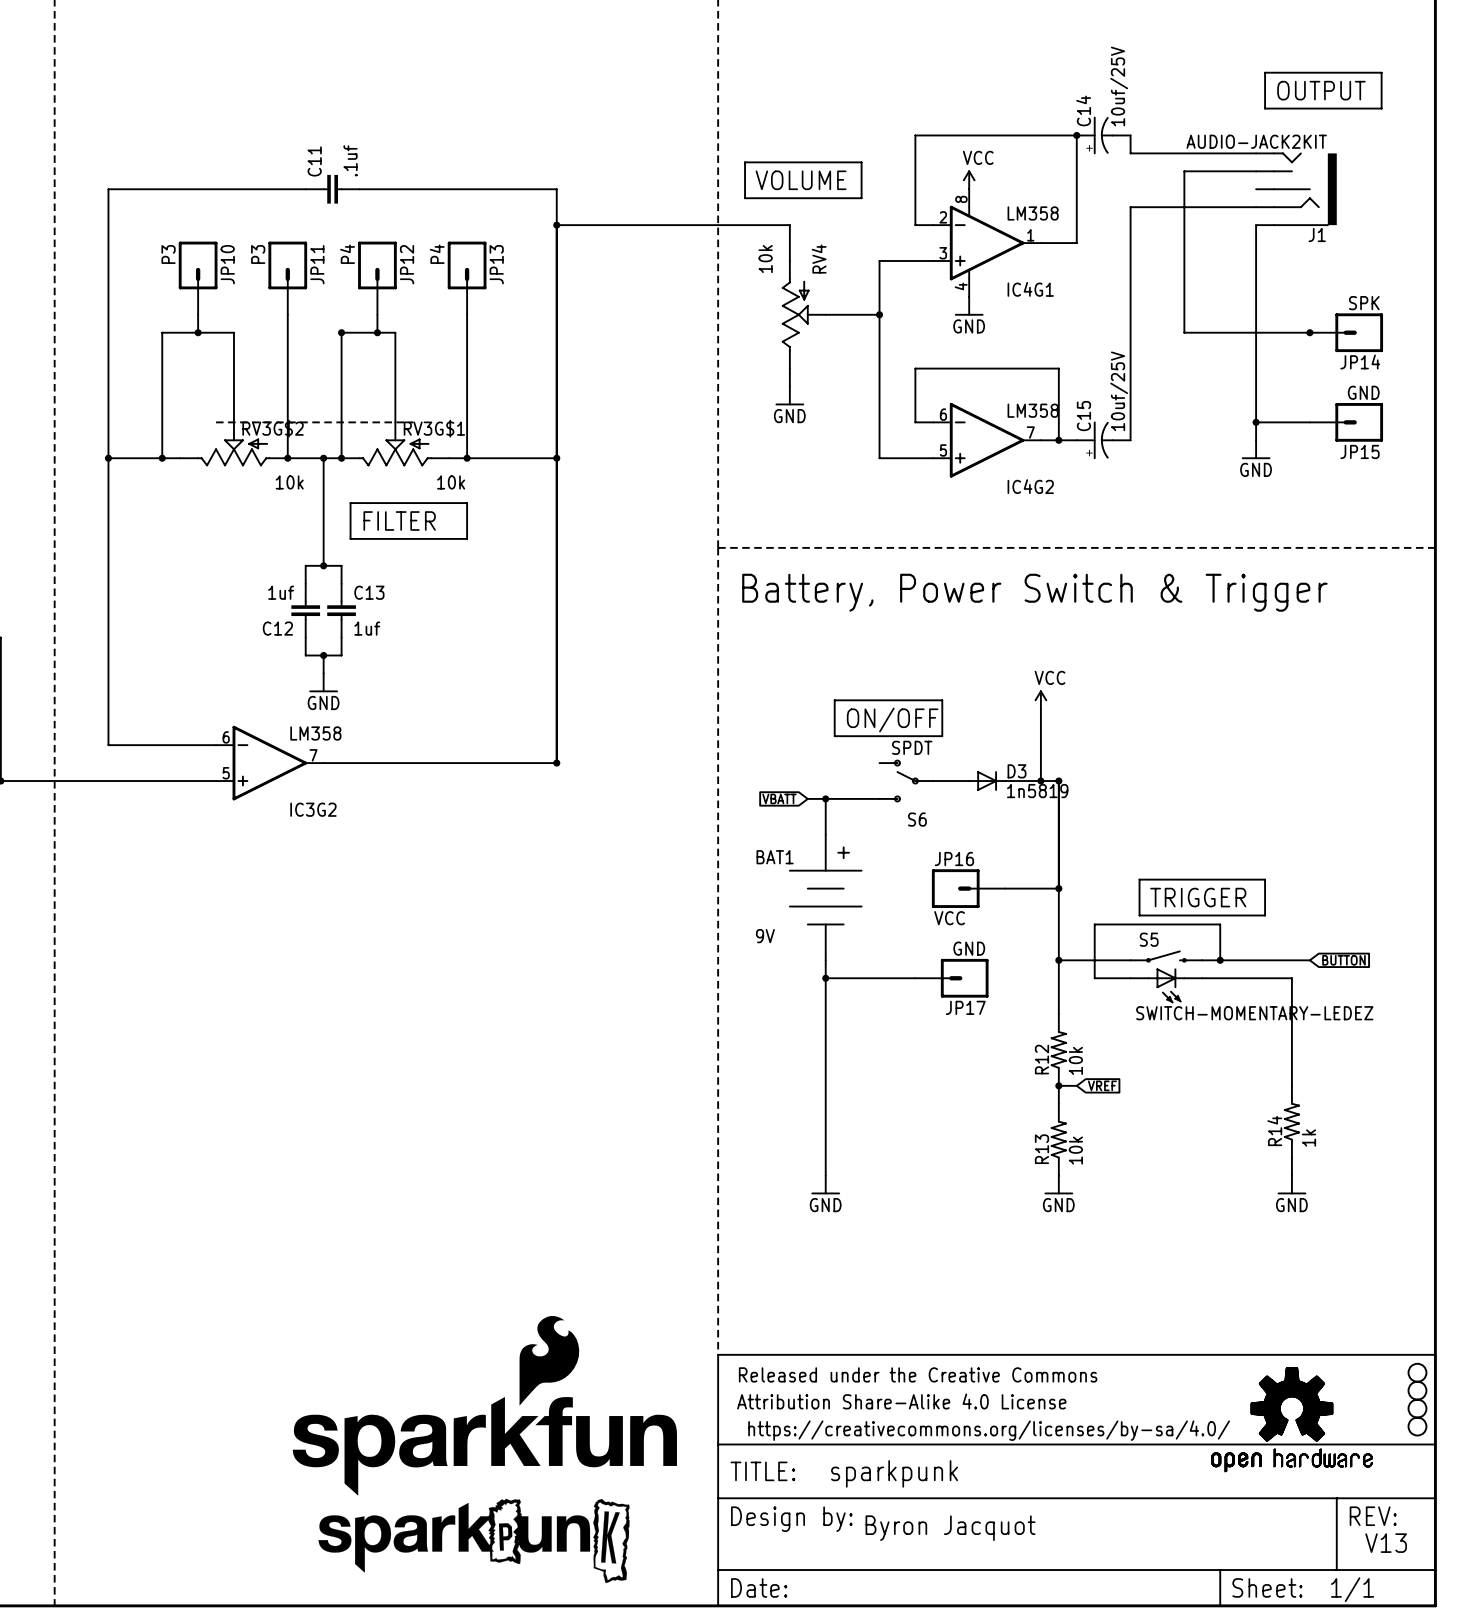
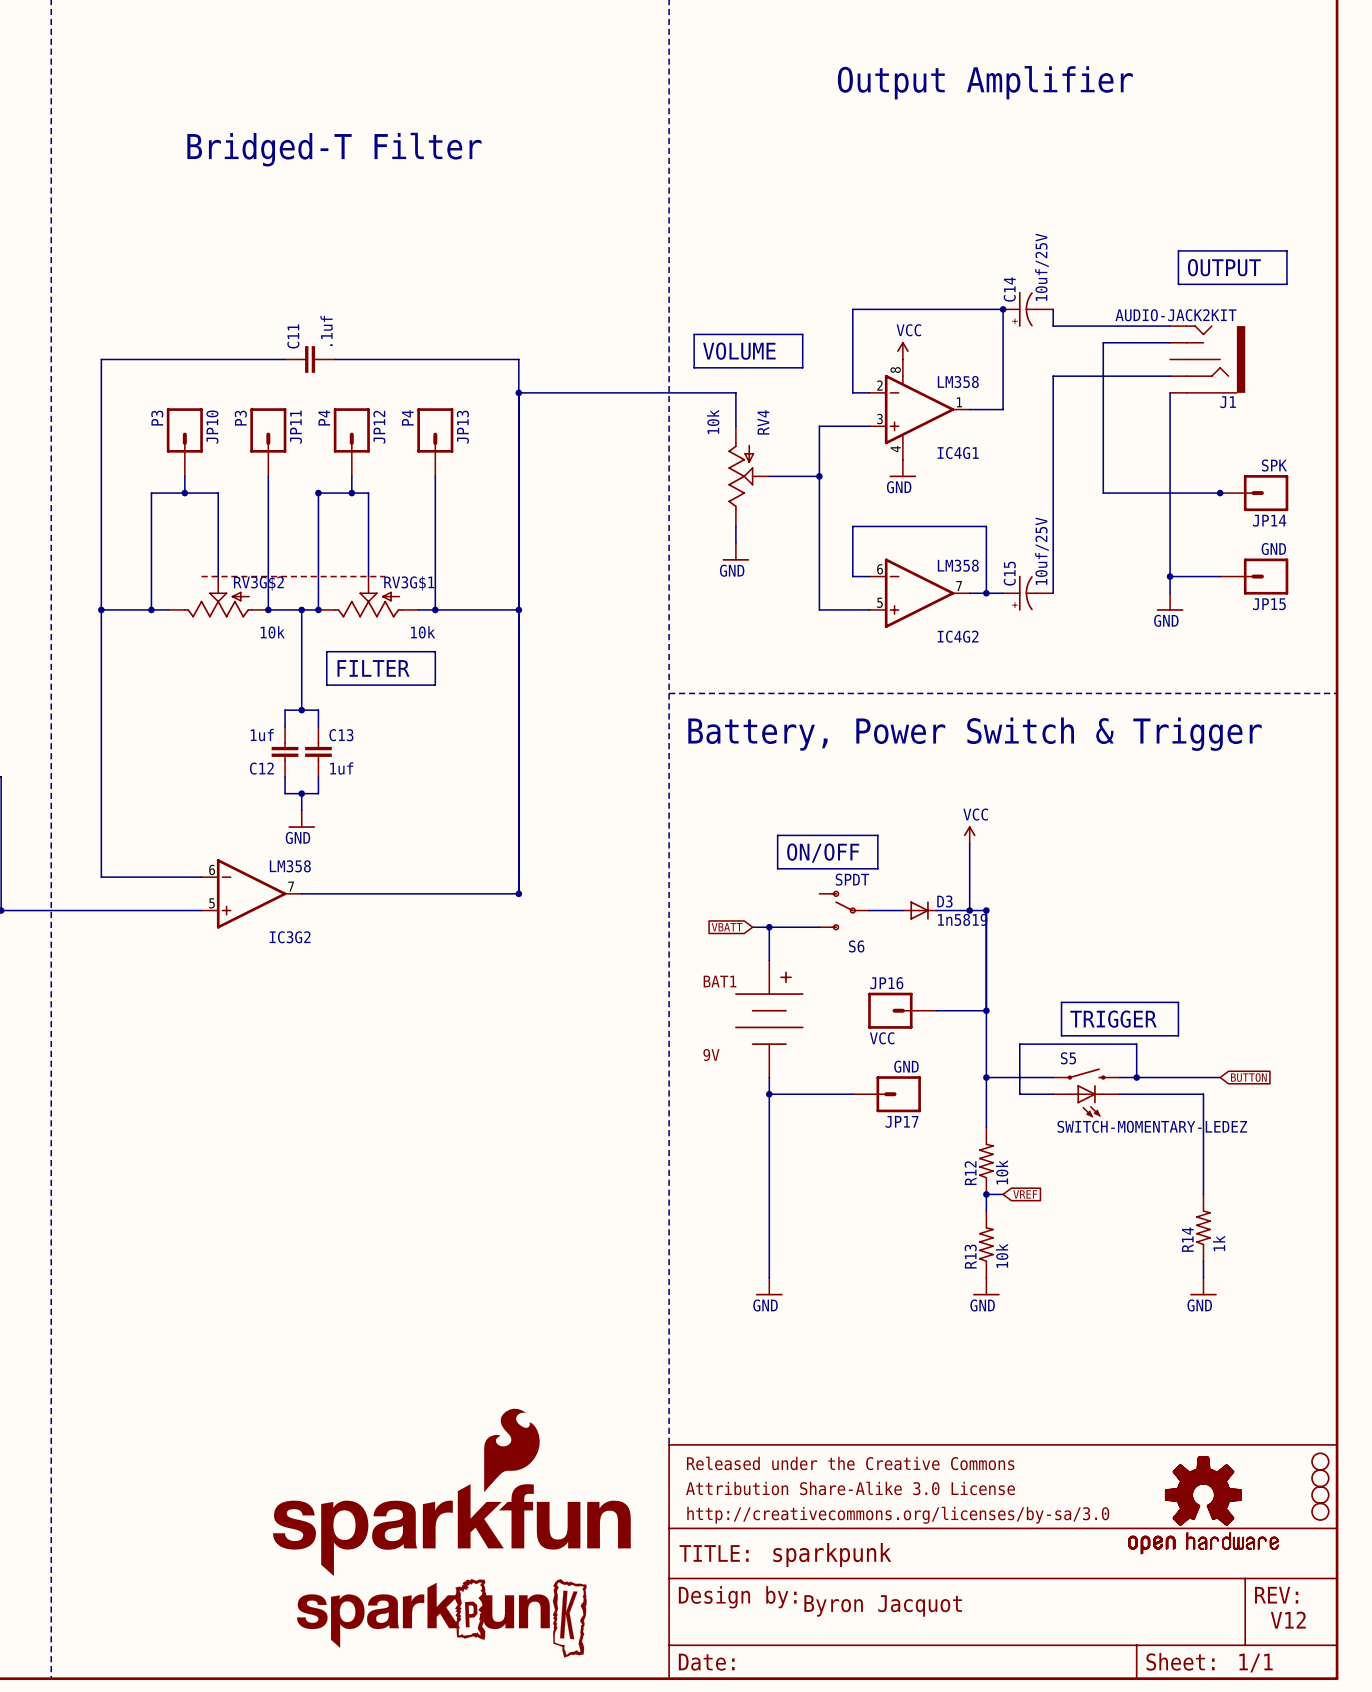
part text: Attribution Share-Alike 4.0 License (901, 1401) -> Attribution Share-Alike 3.0 License (850, 1488)
part text: https://creativecommons.org/licenses/by-sa/4.0/ (989, 1430) -> http://creativecommons.org/licenses/by-sa/3.0 (898, 1515)
text: V13 (1386, 1543) -> V12 (1288, 1620)

